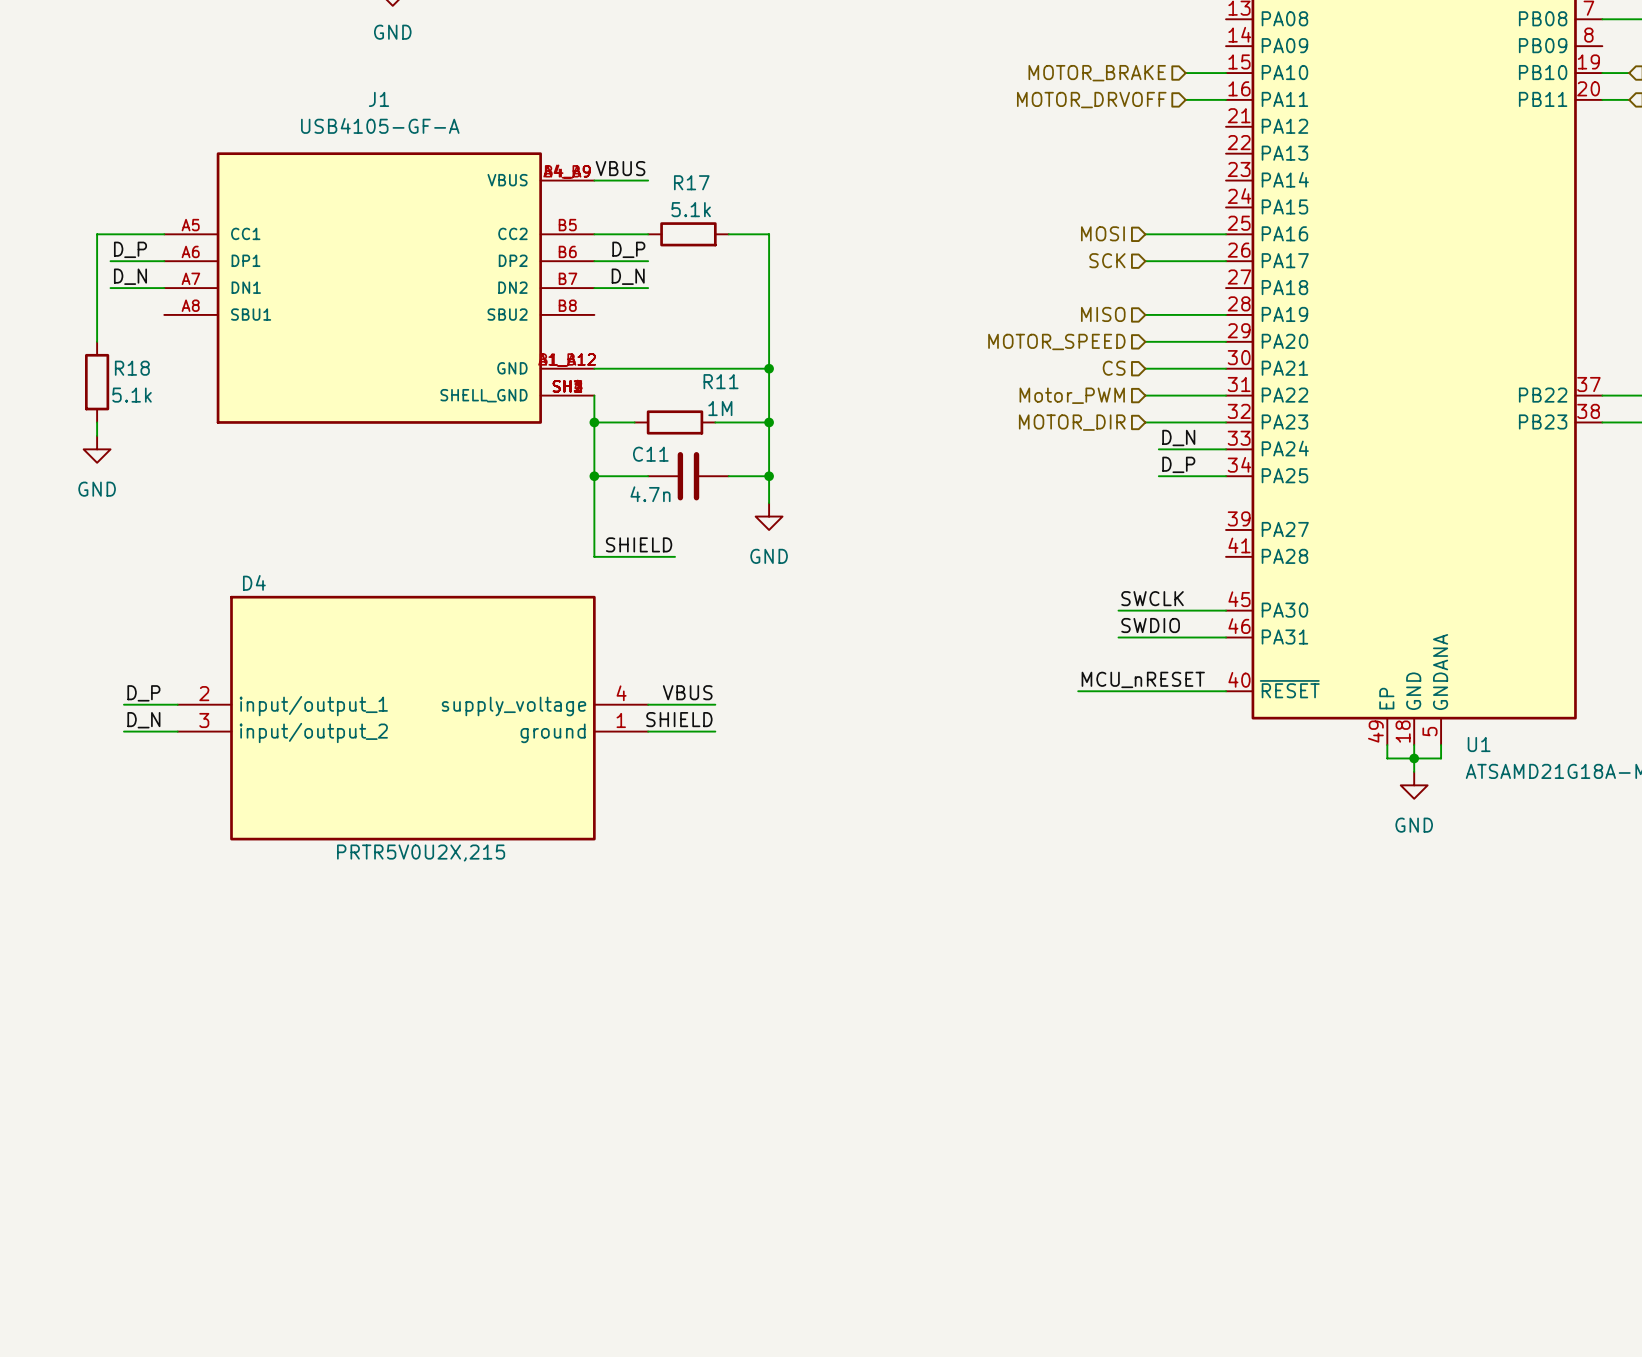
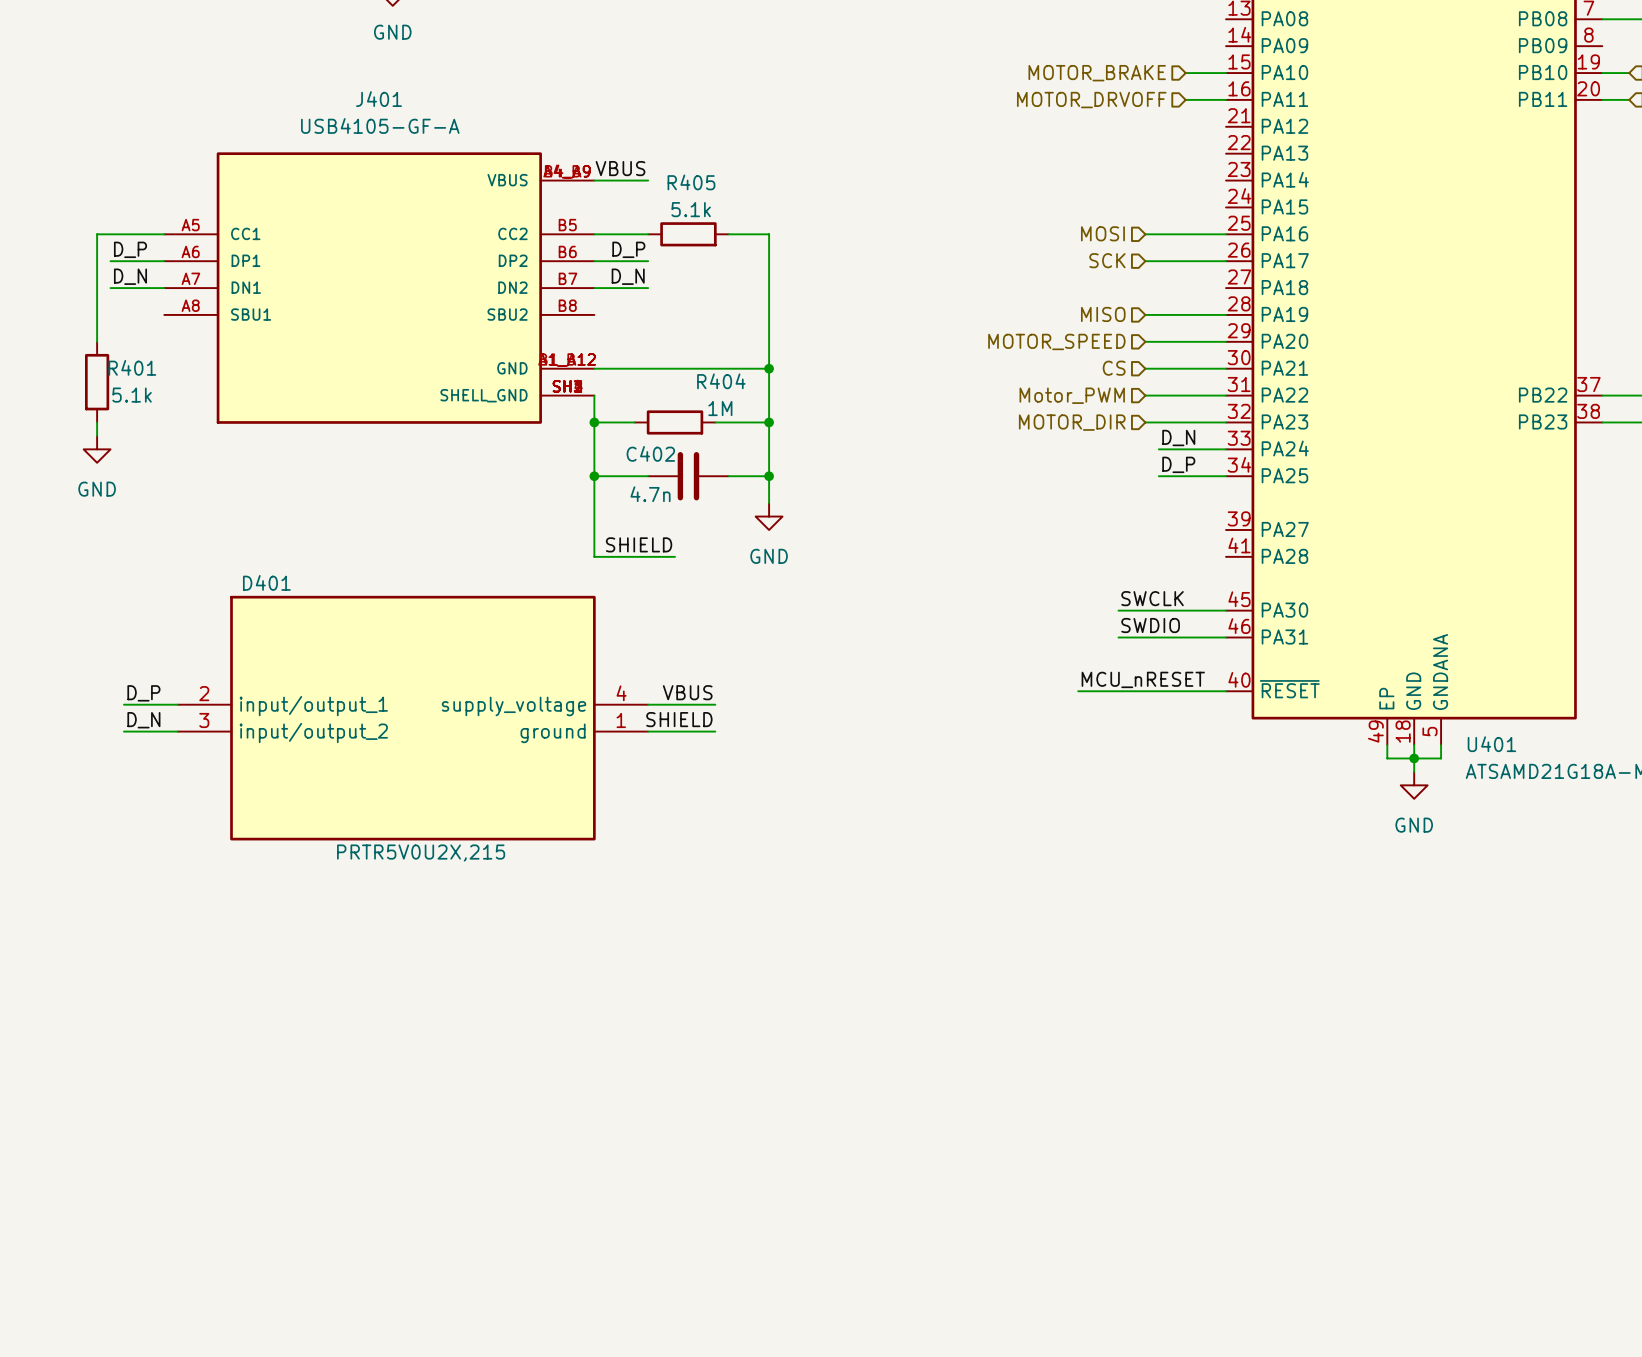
J1 name: J1 (379, 99) -> J401 (379, 99)
R17 name: R17 (691, 182) -> R405 (691, 182)
R18 name: R18 (132, 368) -> R401 (132, 367)
R11 name: R11 (721, 381) -> R404 (721, 381)
C11 name: C11 (650, 454) -> C402 (650, 453)
D4 name: D4 (254, 582) -> D401 (266, 582)
U1 name: U1 (1479, 744) -> U401 (1491, 744)

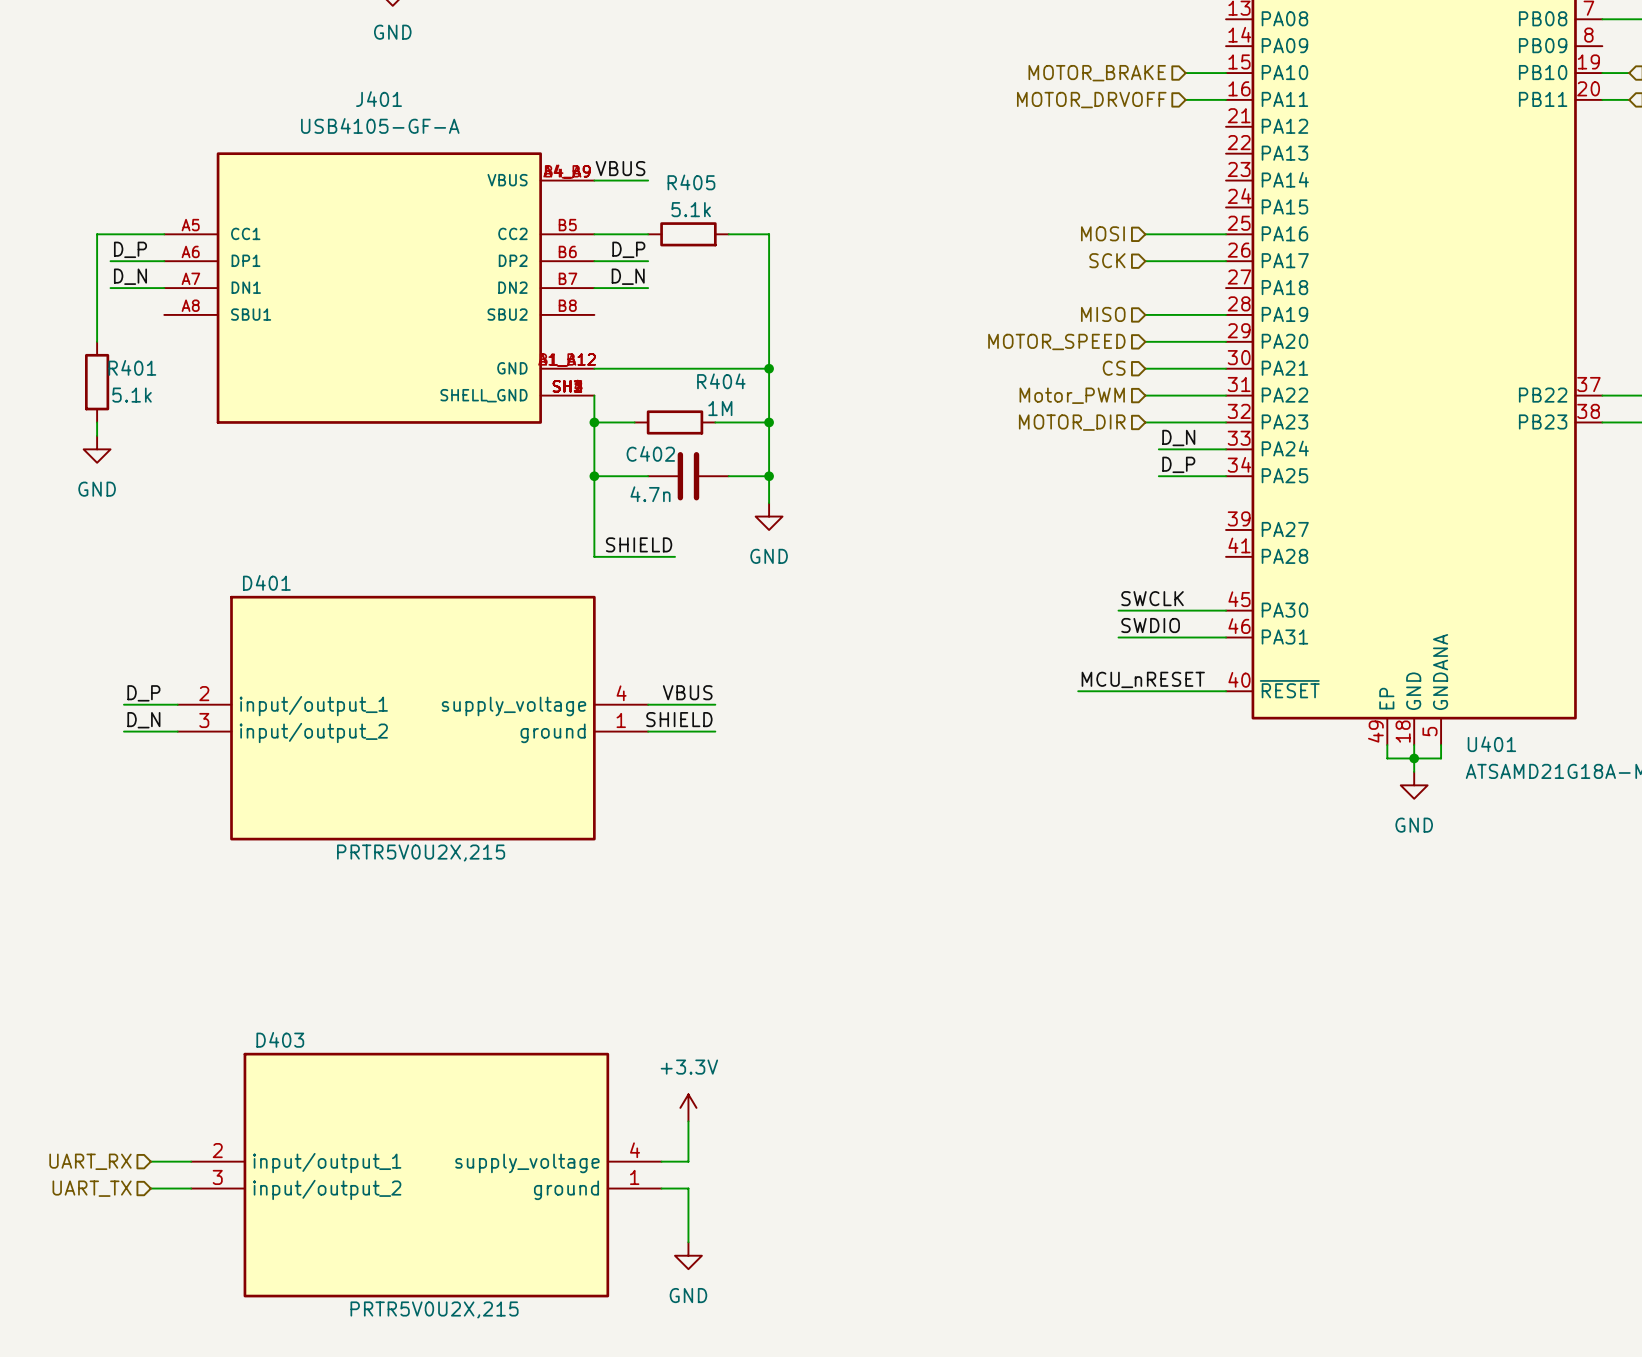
power symbol: none -> +3.3V (688, 1107)
wire: none -> (688, 1121) (688, 1161) (661, 1161)
hierarchical label: none -> UART_RX (90, 1161)
wire: none -> (150, 1161) (191, 1161)
D403: none -> PRTR5V0U2X,215 (426, 1175)
hierarchical label: none -> UART_TX (92, 1188)
wire: none -> (150, 1188) (191, 1188)
wire: none -> (661, 1188) (688, 1188) (688, 1242)
power symbol: none -> GND (688, 1255)

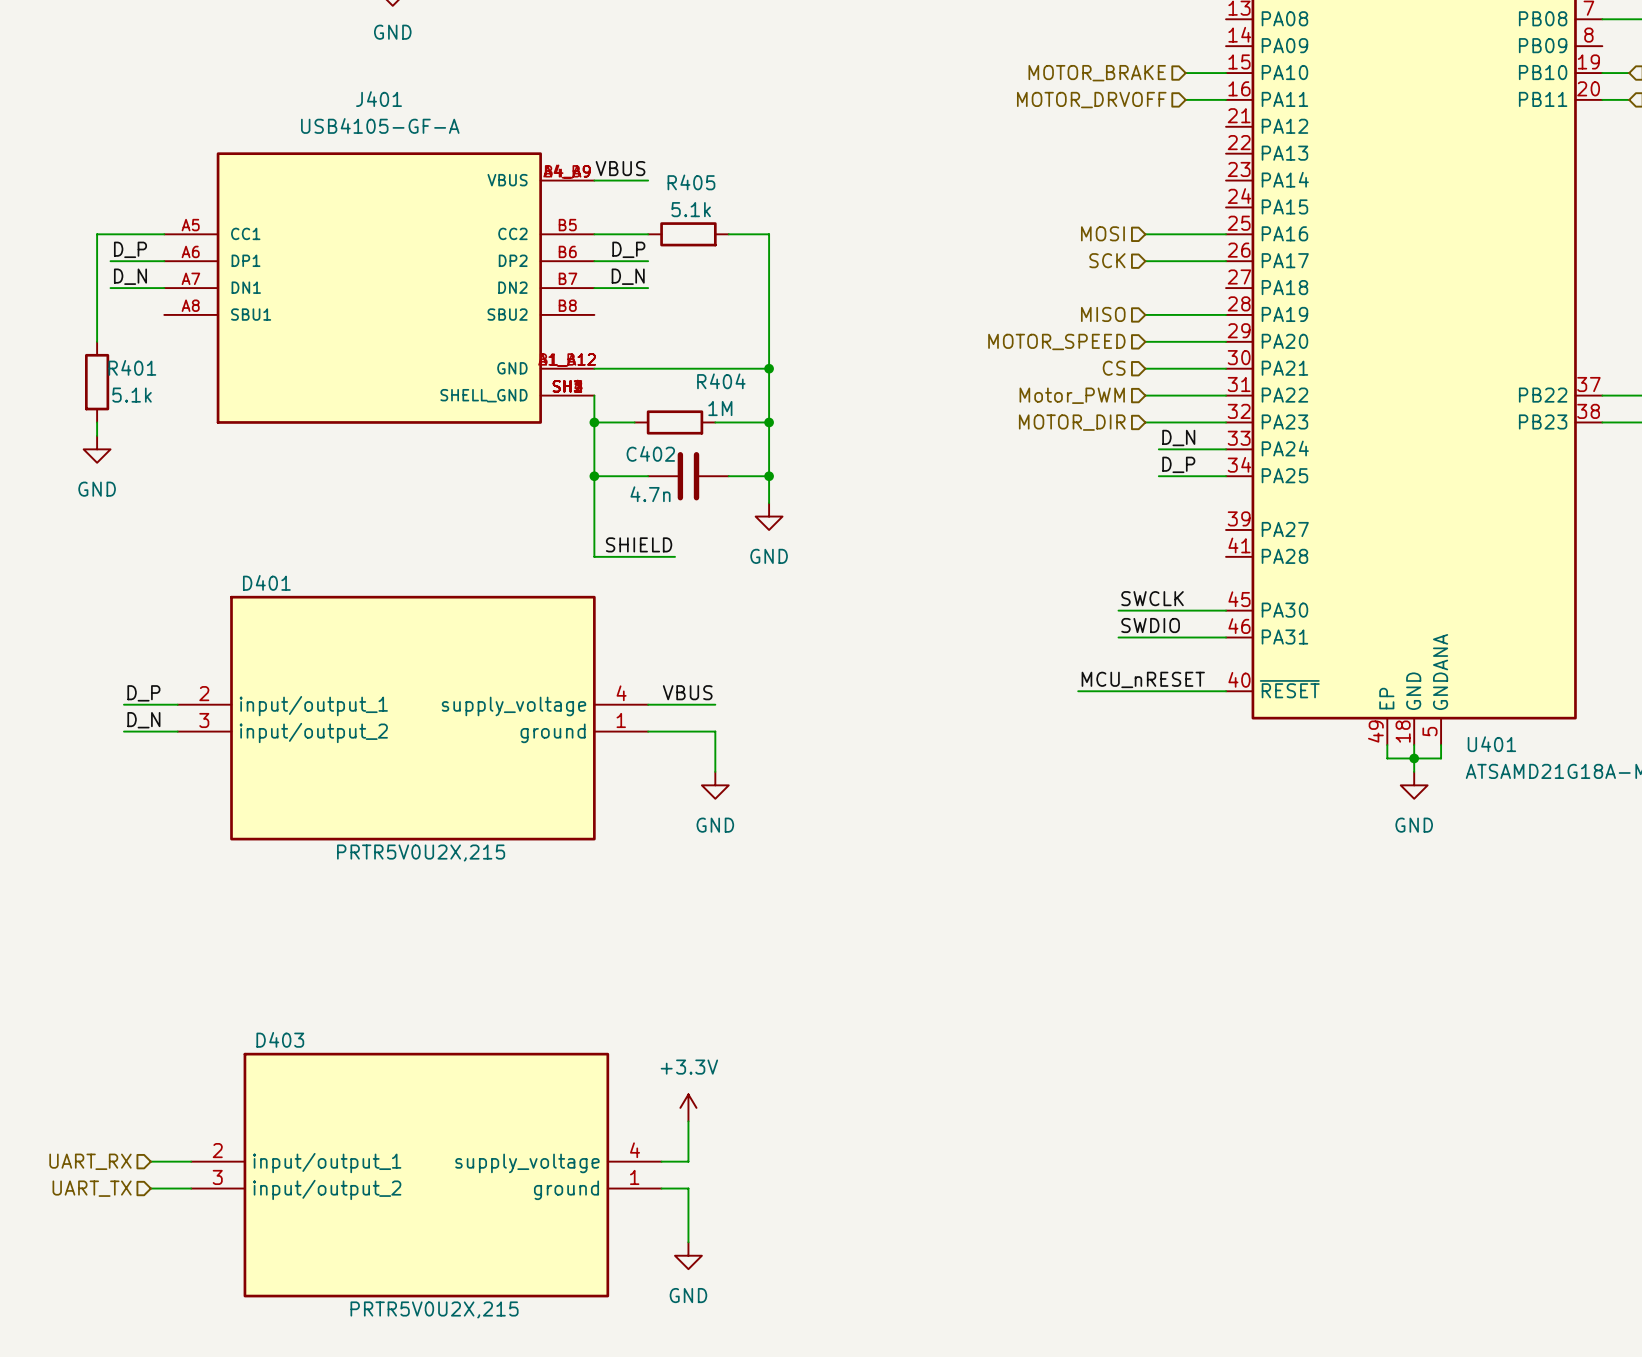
label: SHIELD (679, 719) -> none
wire: none -> (715, 731) (715, 771)
power symbol: none -> GND (715, 785)

